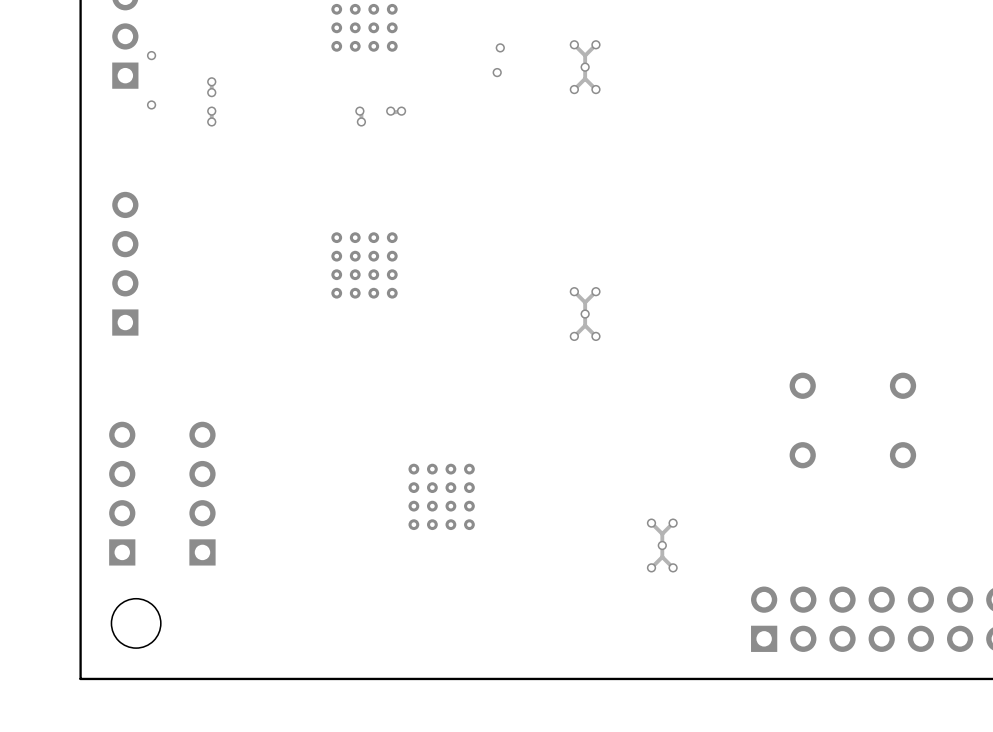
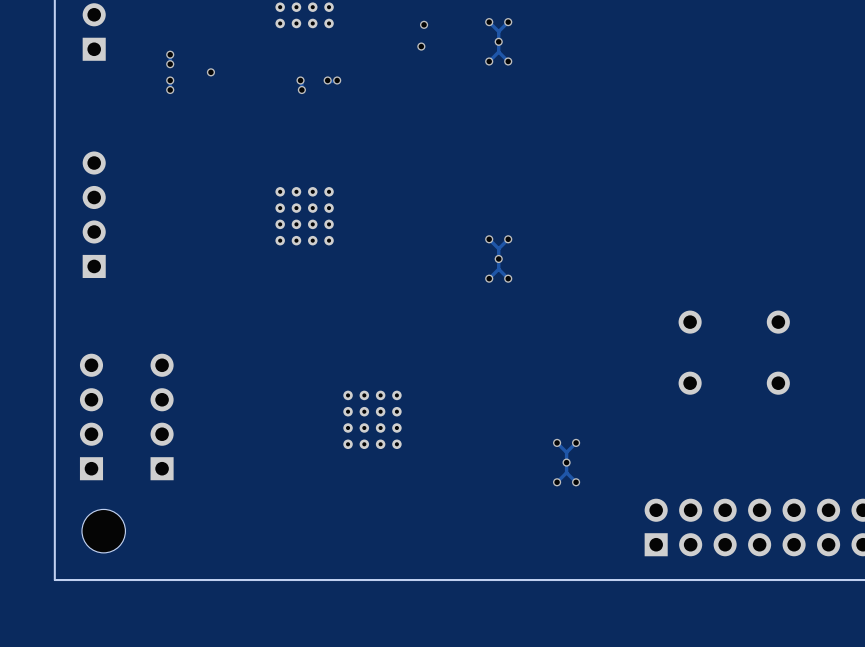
via: (151, 55) -> none
via: none -> (210, 72)
via: (151, 104) -> none

